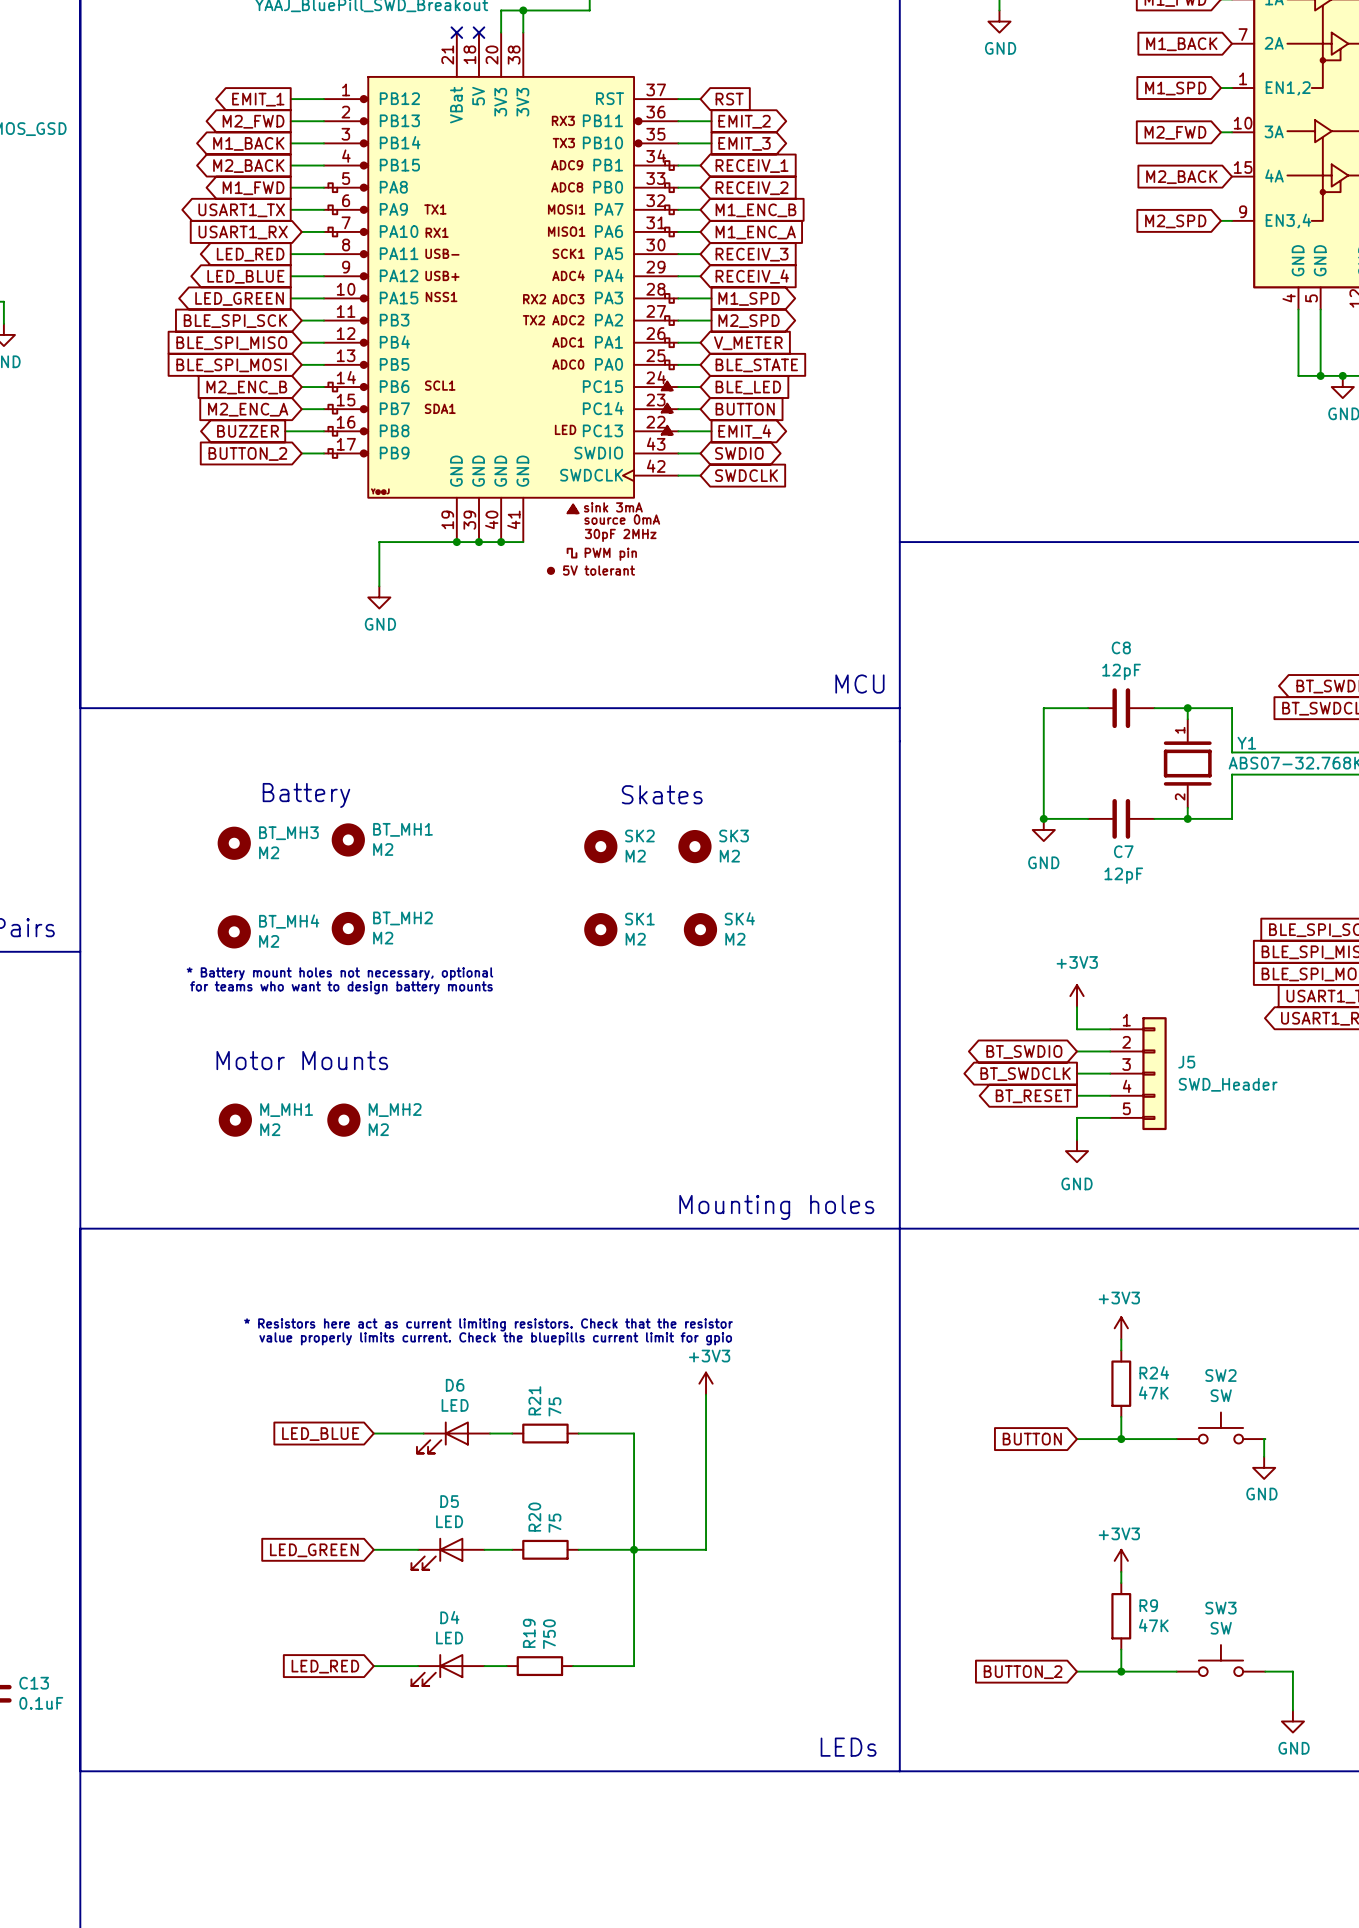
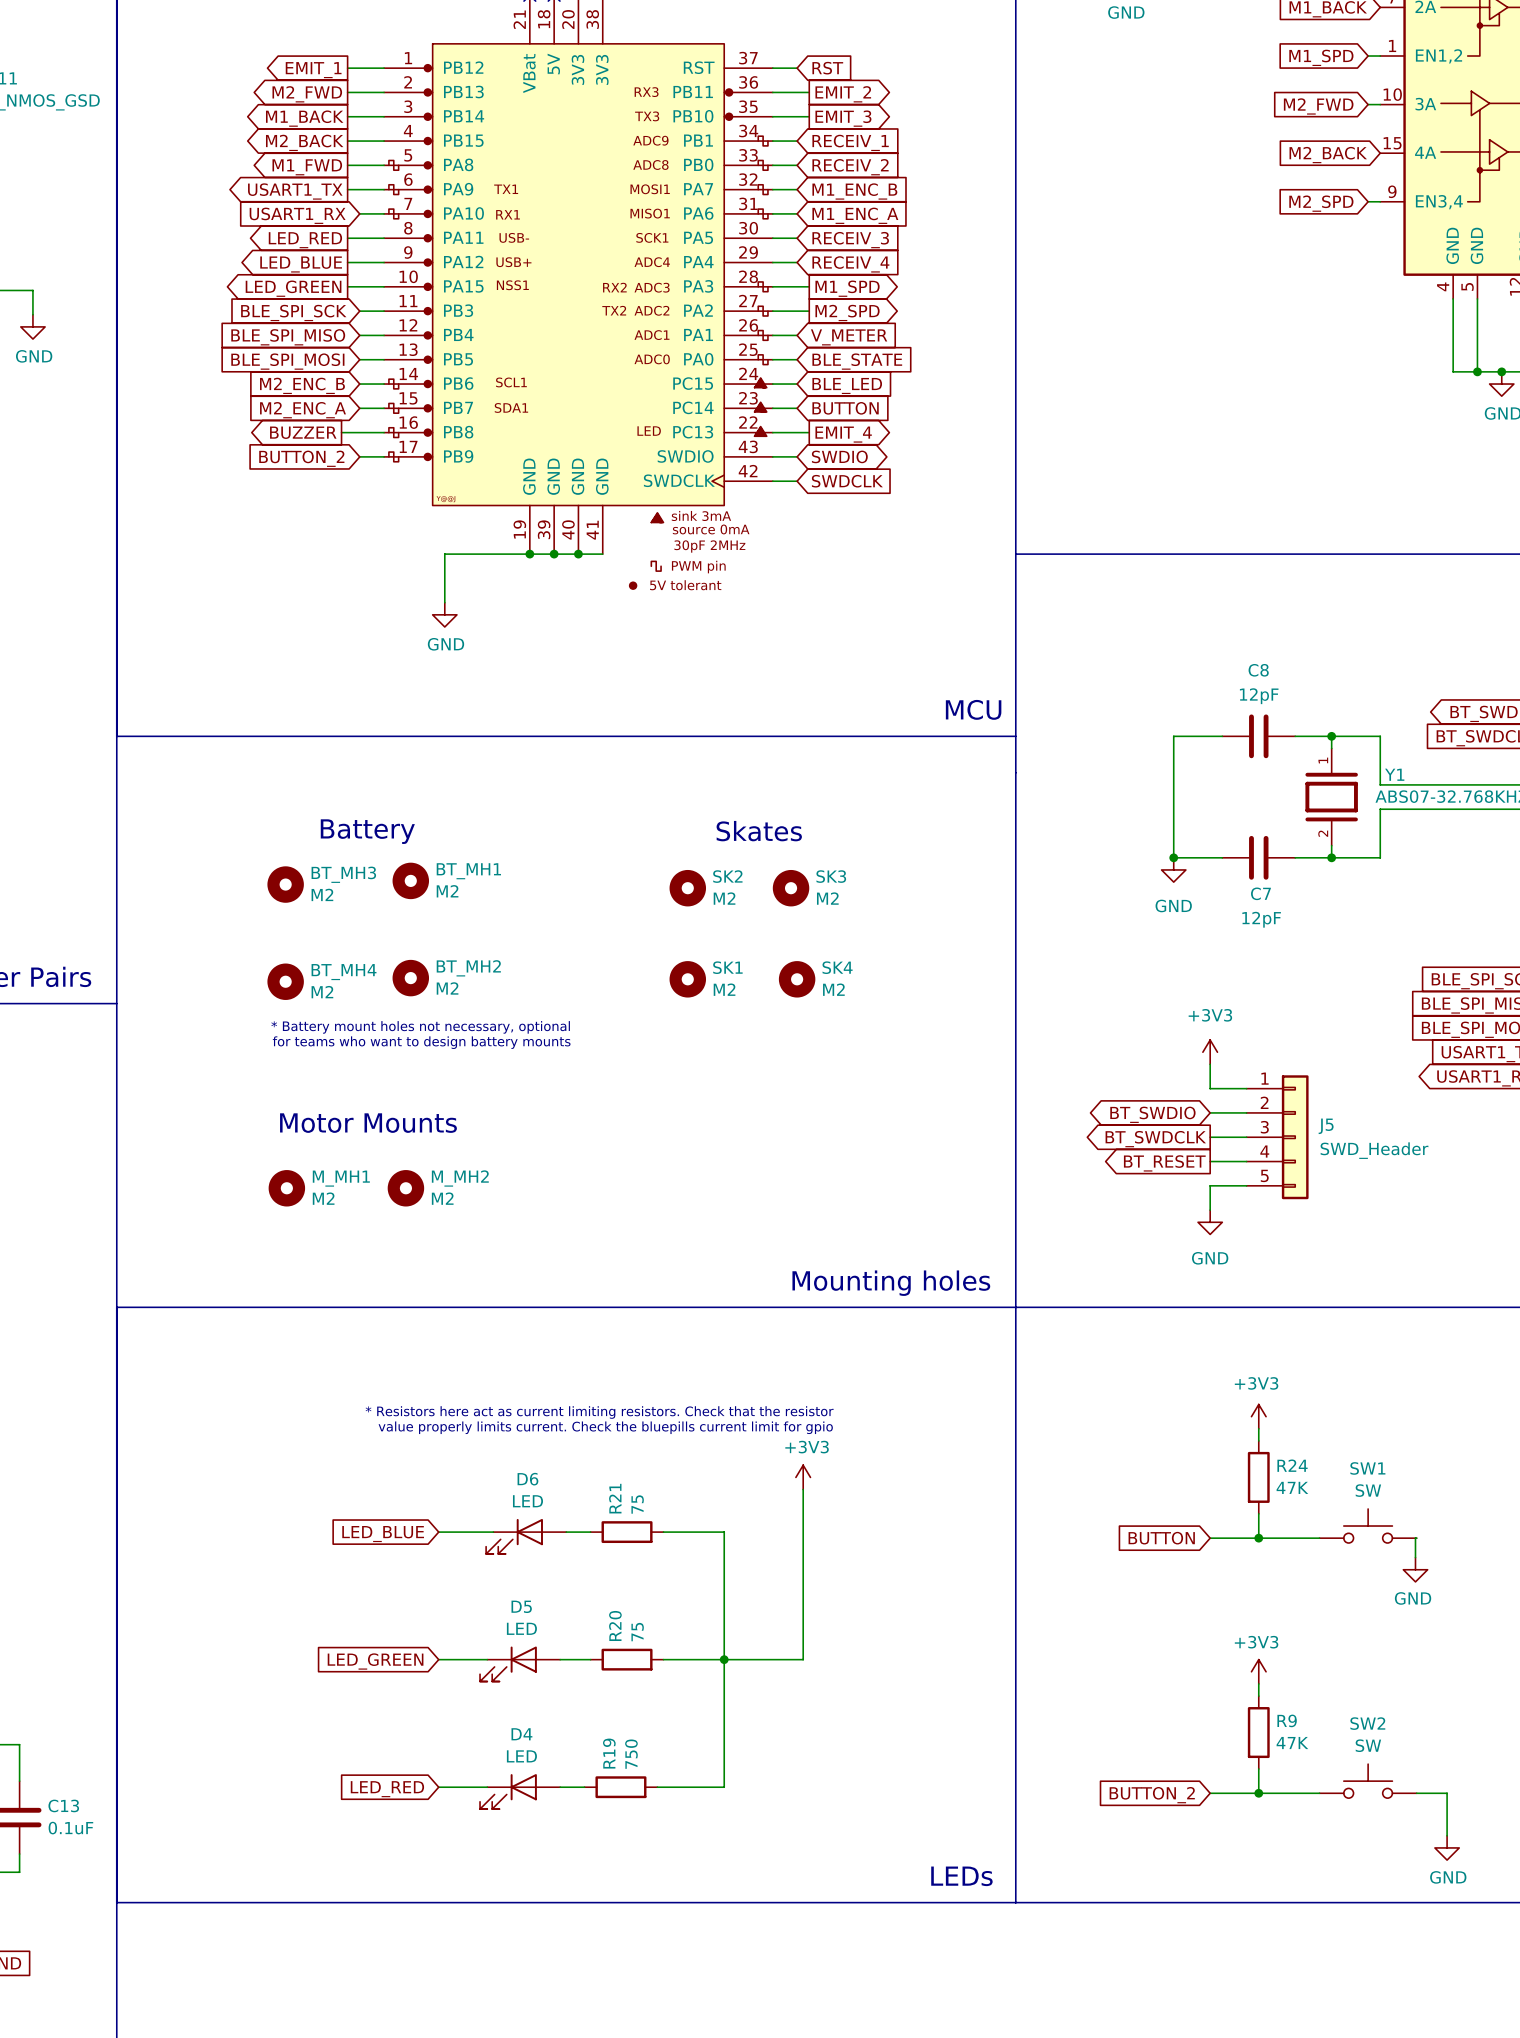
SW2 name: SW2 (1220, 1375) -> SW1 (1367, 1468)
SW3 name: SW3 (1220, 1608) -> SW2 (1367, 1723)

